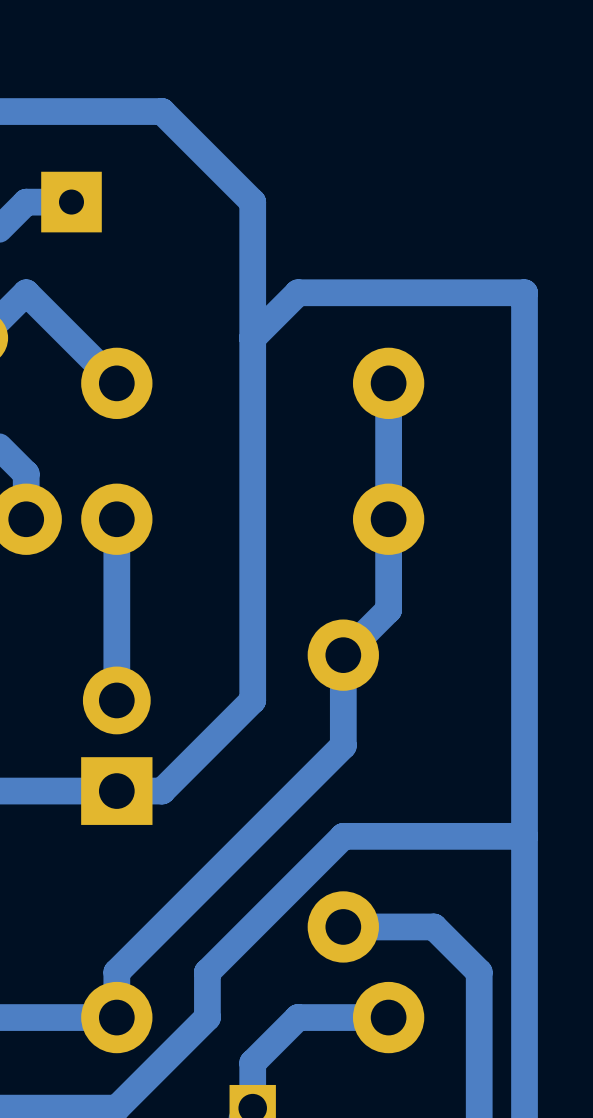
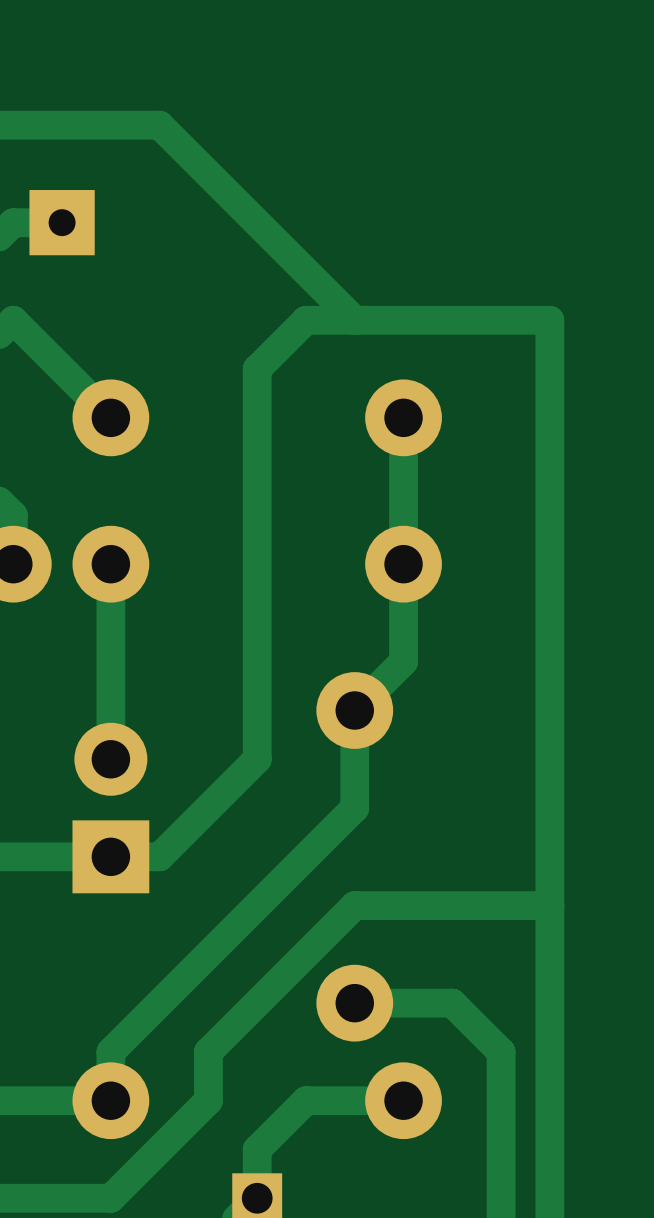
track: (252, 202) (252, 338) -> (257, 222) (354, 320)

